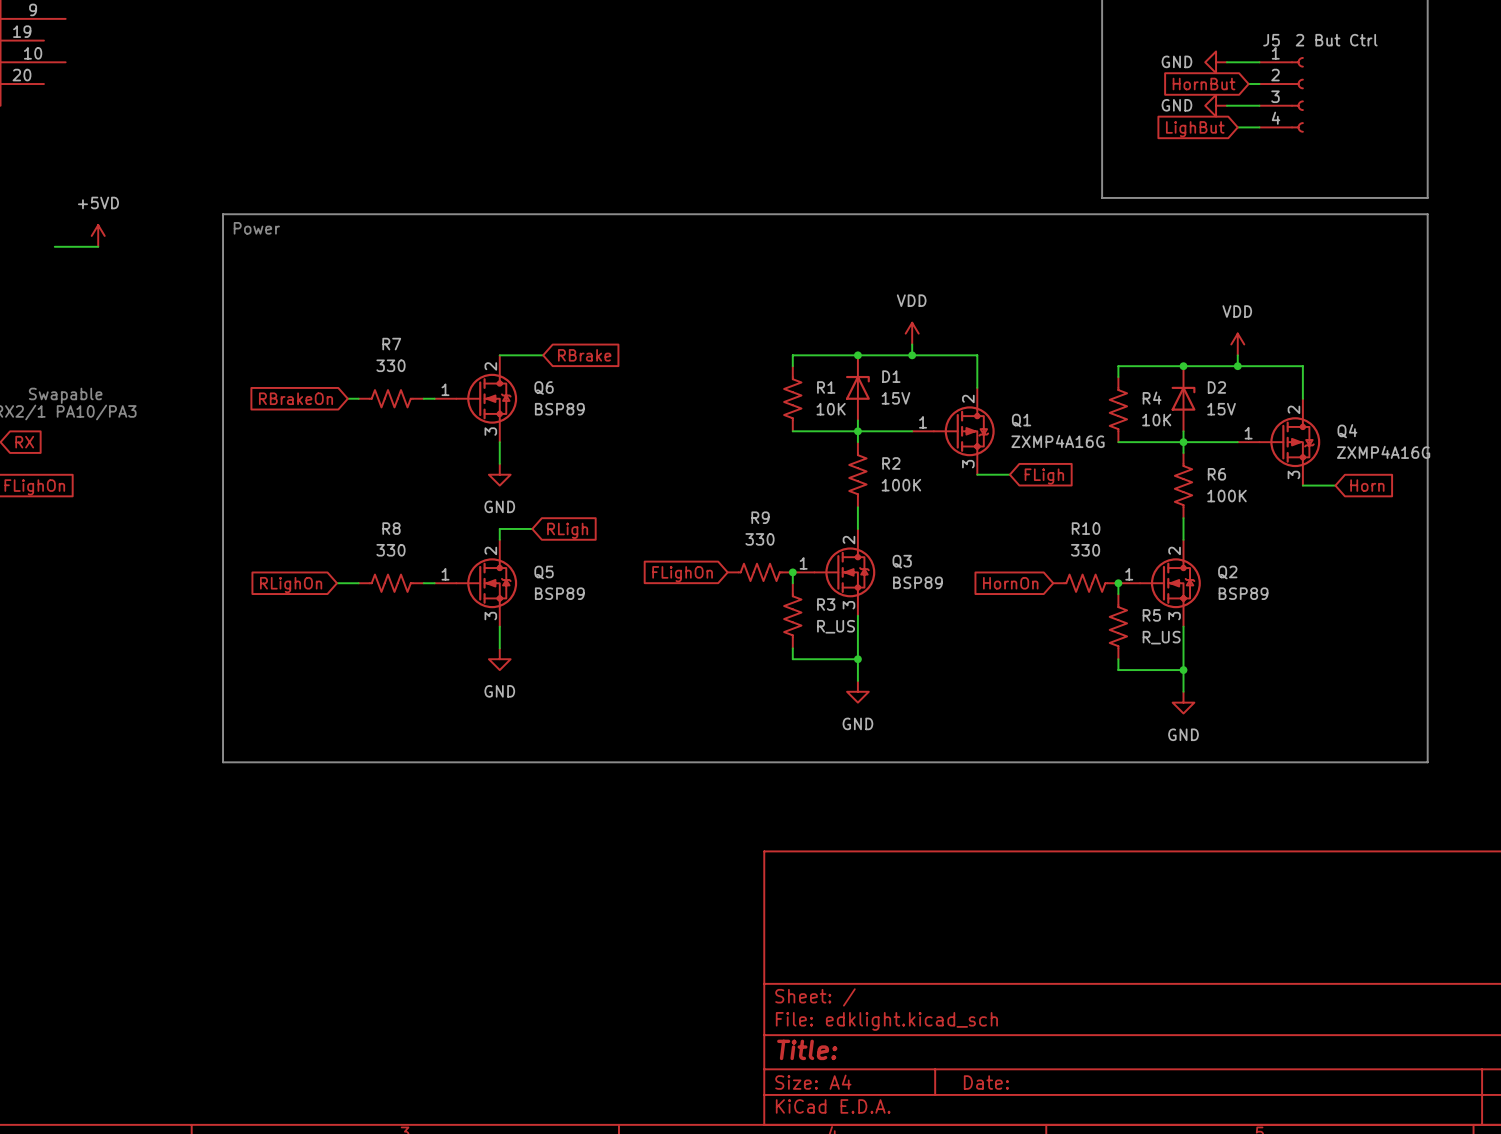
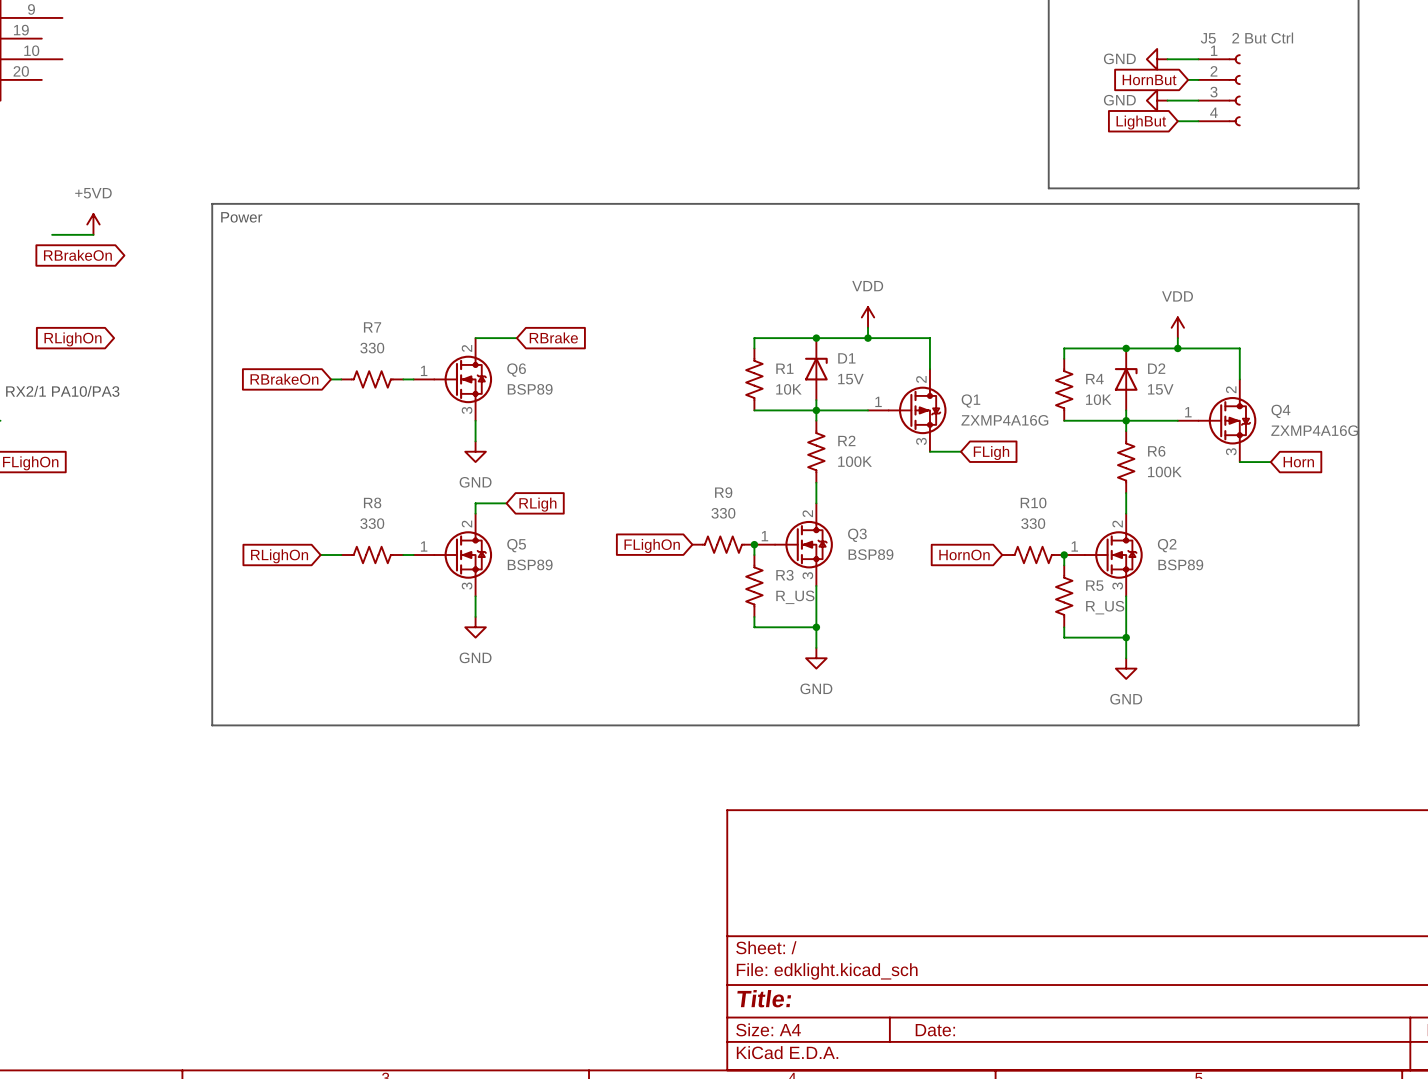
global label: none -> RBrakeOn (77, 255)
global label: none -> RLighOn (73, 339)
text: Swapable (65, 395) -> none
global label: RX (24, 442) -> none

